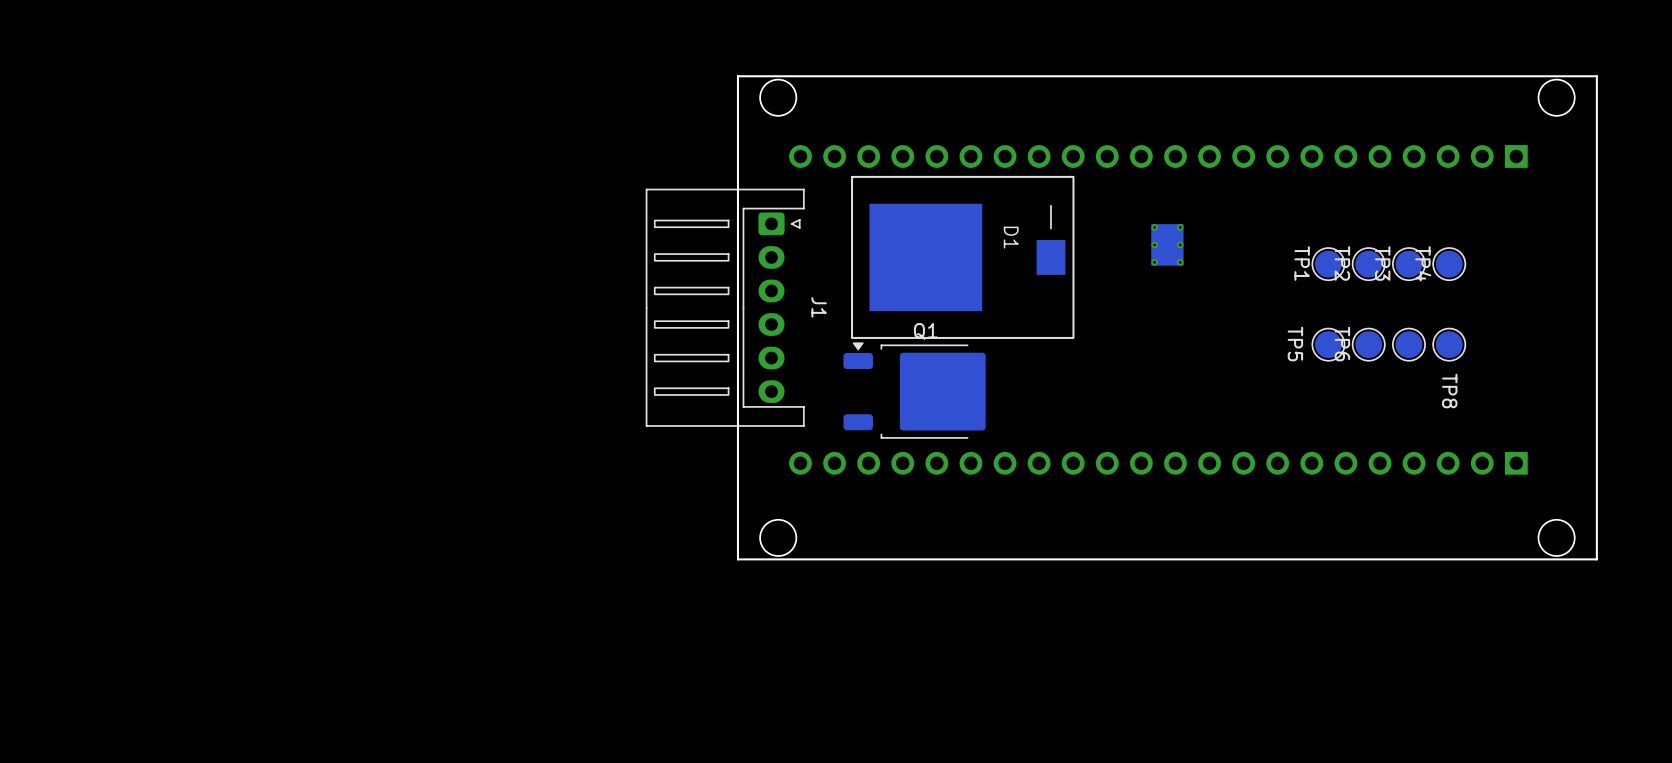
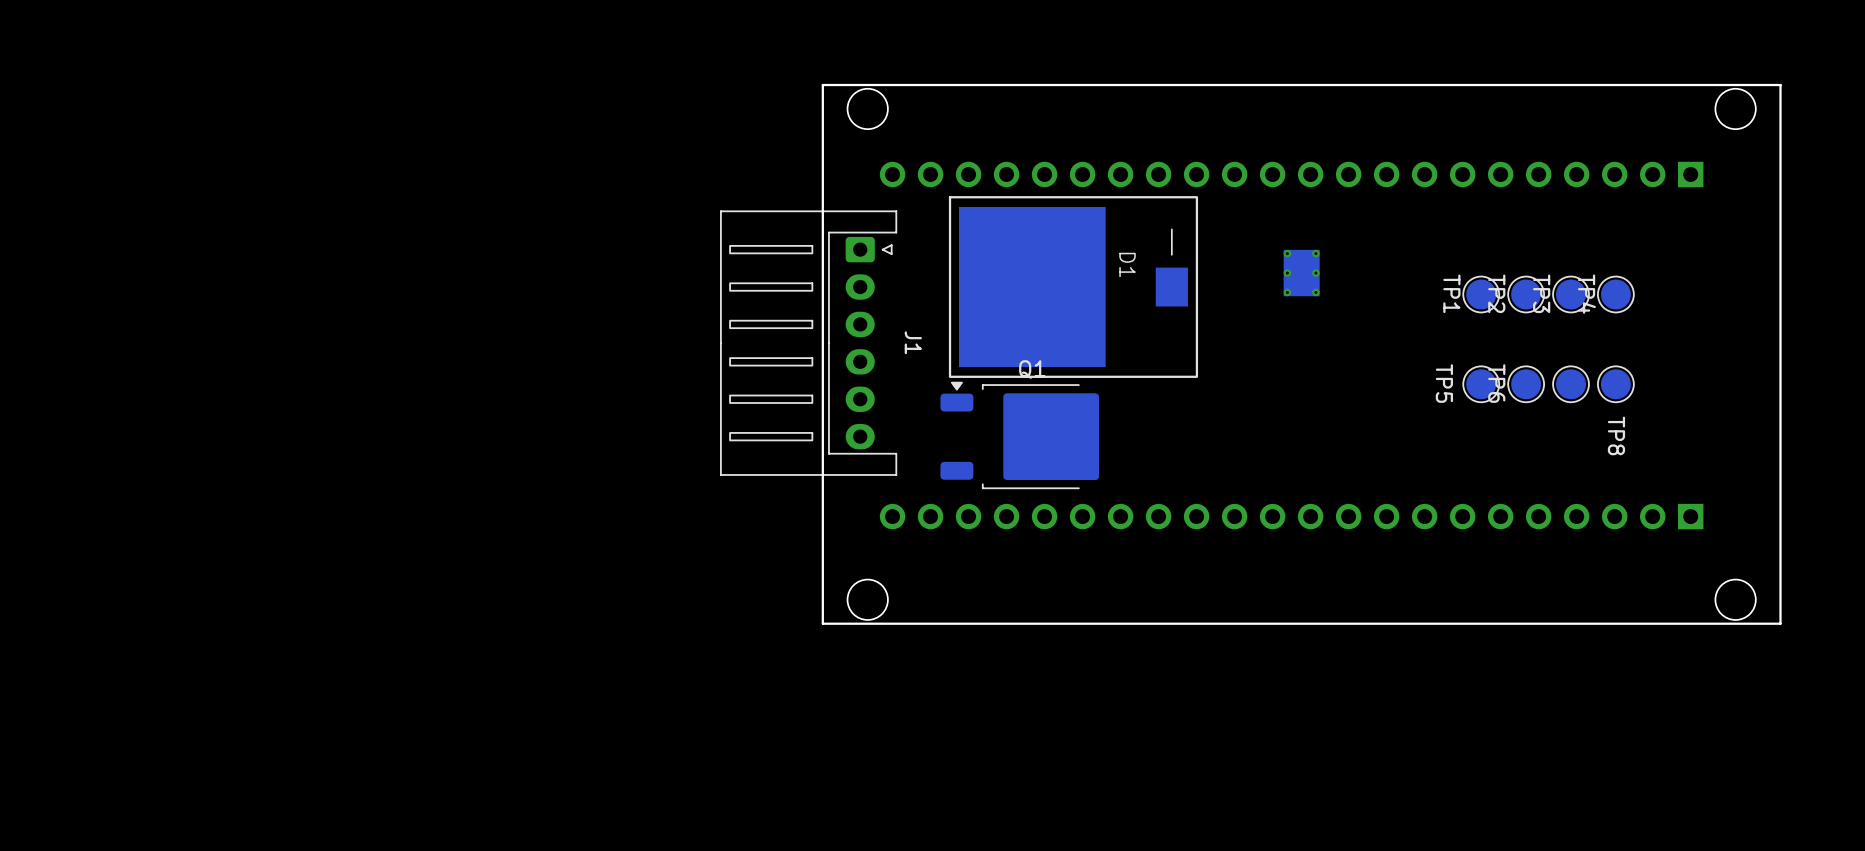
D1 footprint: [851, 175, 1075, 339] -> [948, 196, 1199, 378]

